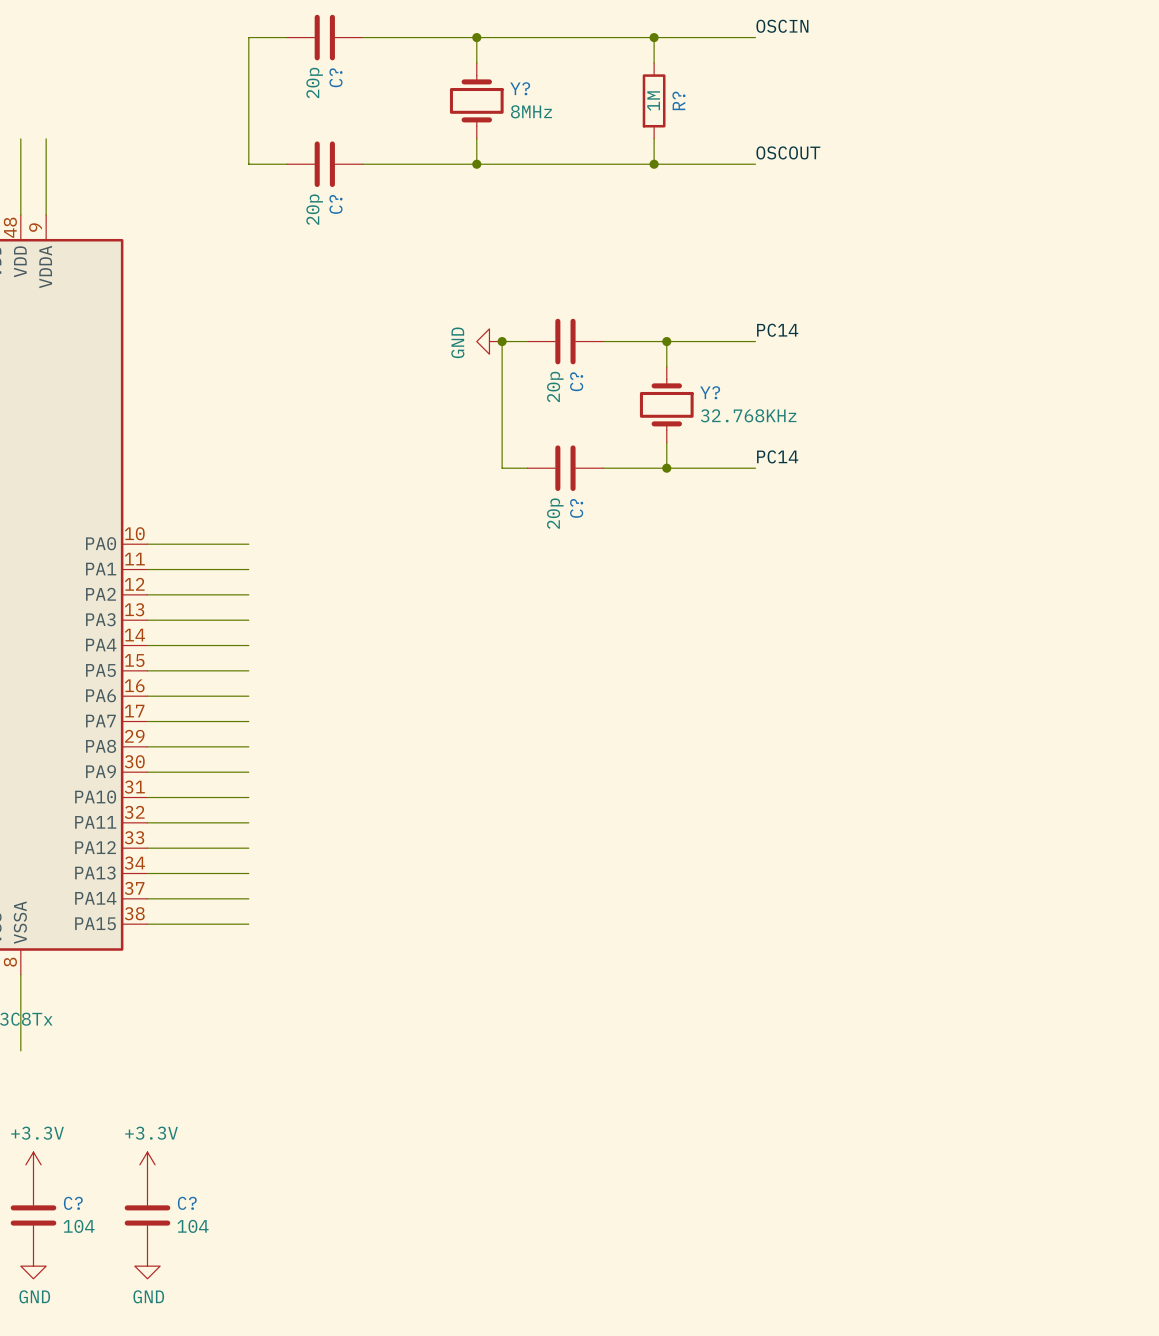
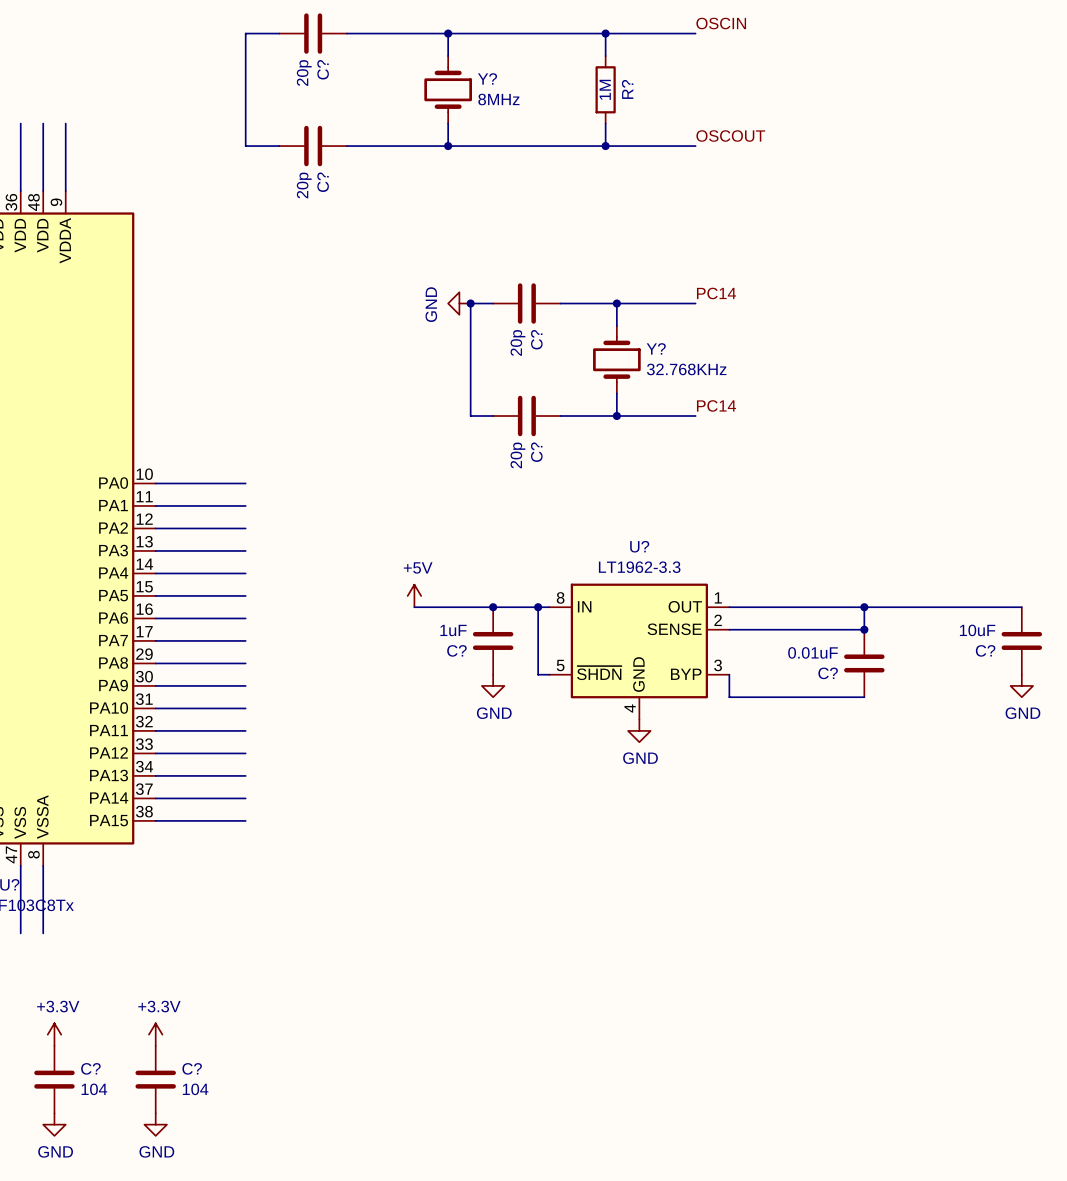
power symbol: none -> +5V (414, 595)
wire: none -> (414, 607) (549, 607)
junction: none -> (493, 607)
wire: none -> (538, 607) (538, 674) (549, 674)
junction: none -> (538, 607)
wire: none -> (729, 607) (1021, 607)
wire: none -> (864, 607) (864, 629) (729, 629)
junction: none -> (864, 607)
junction: none -> (864, 629)
C?: none -> 1uF (493, 640)
C?: none -> 10uF (1021, 640)
U?: none -> LT1962-3.3 (639, 651)
C?: none -> 0.01uF (864, 663)
wire: none -> (729, 674) (729, 697) (864, 697)
power symbol: none -> GND (493, 685)
power symbol: none -> GND (1021, 685)
power symbol: none -> GND (639, 730)

